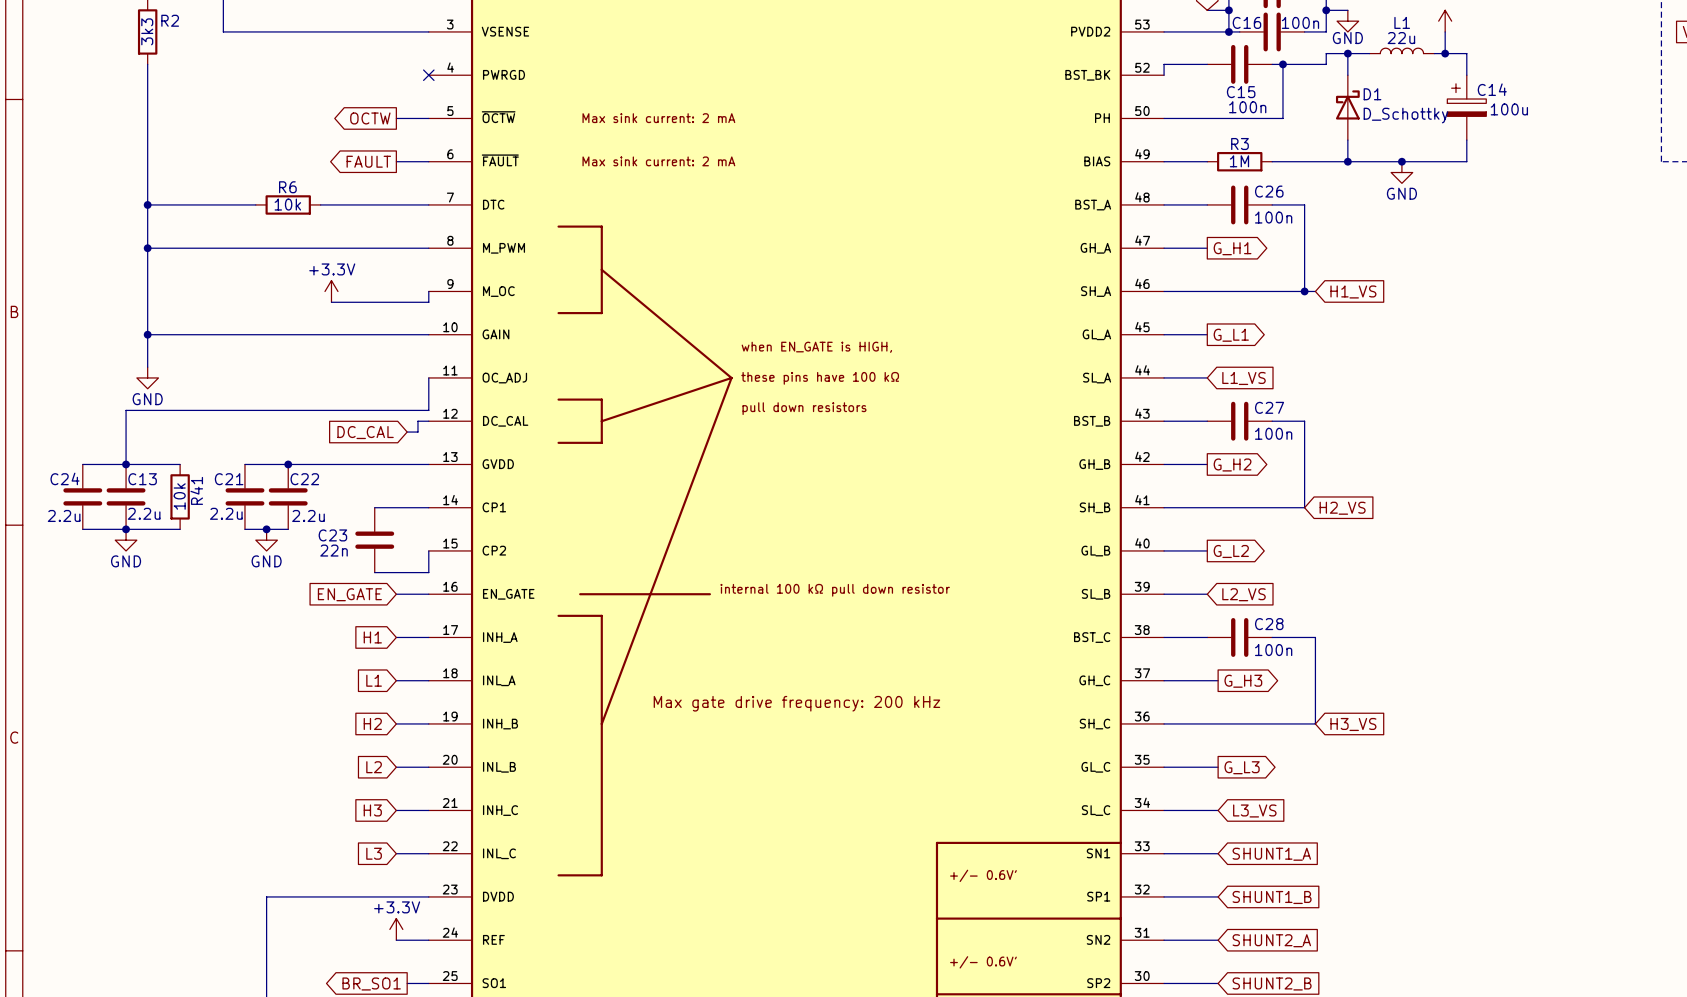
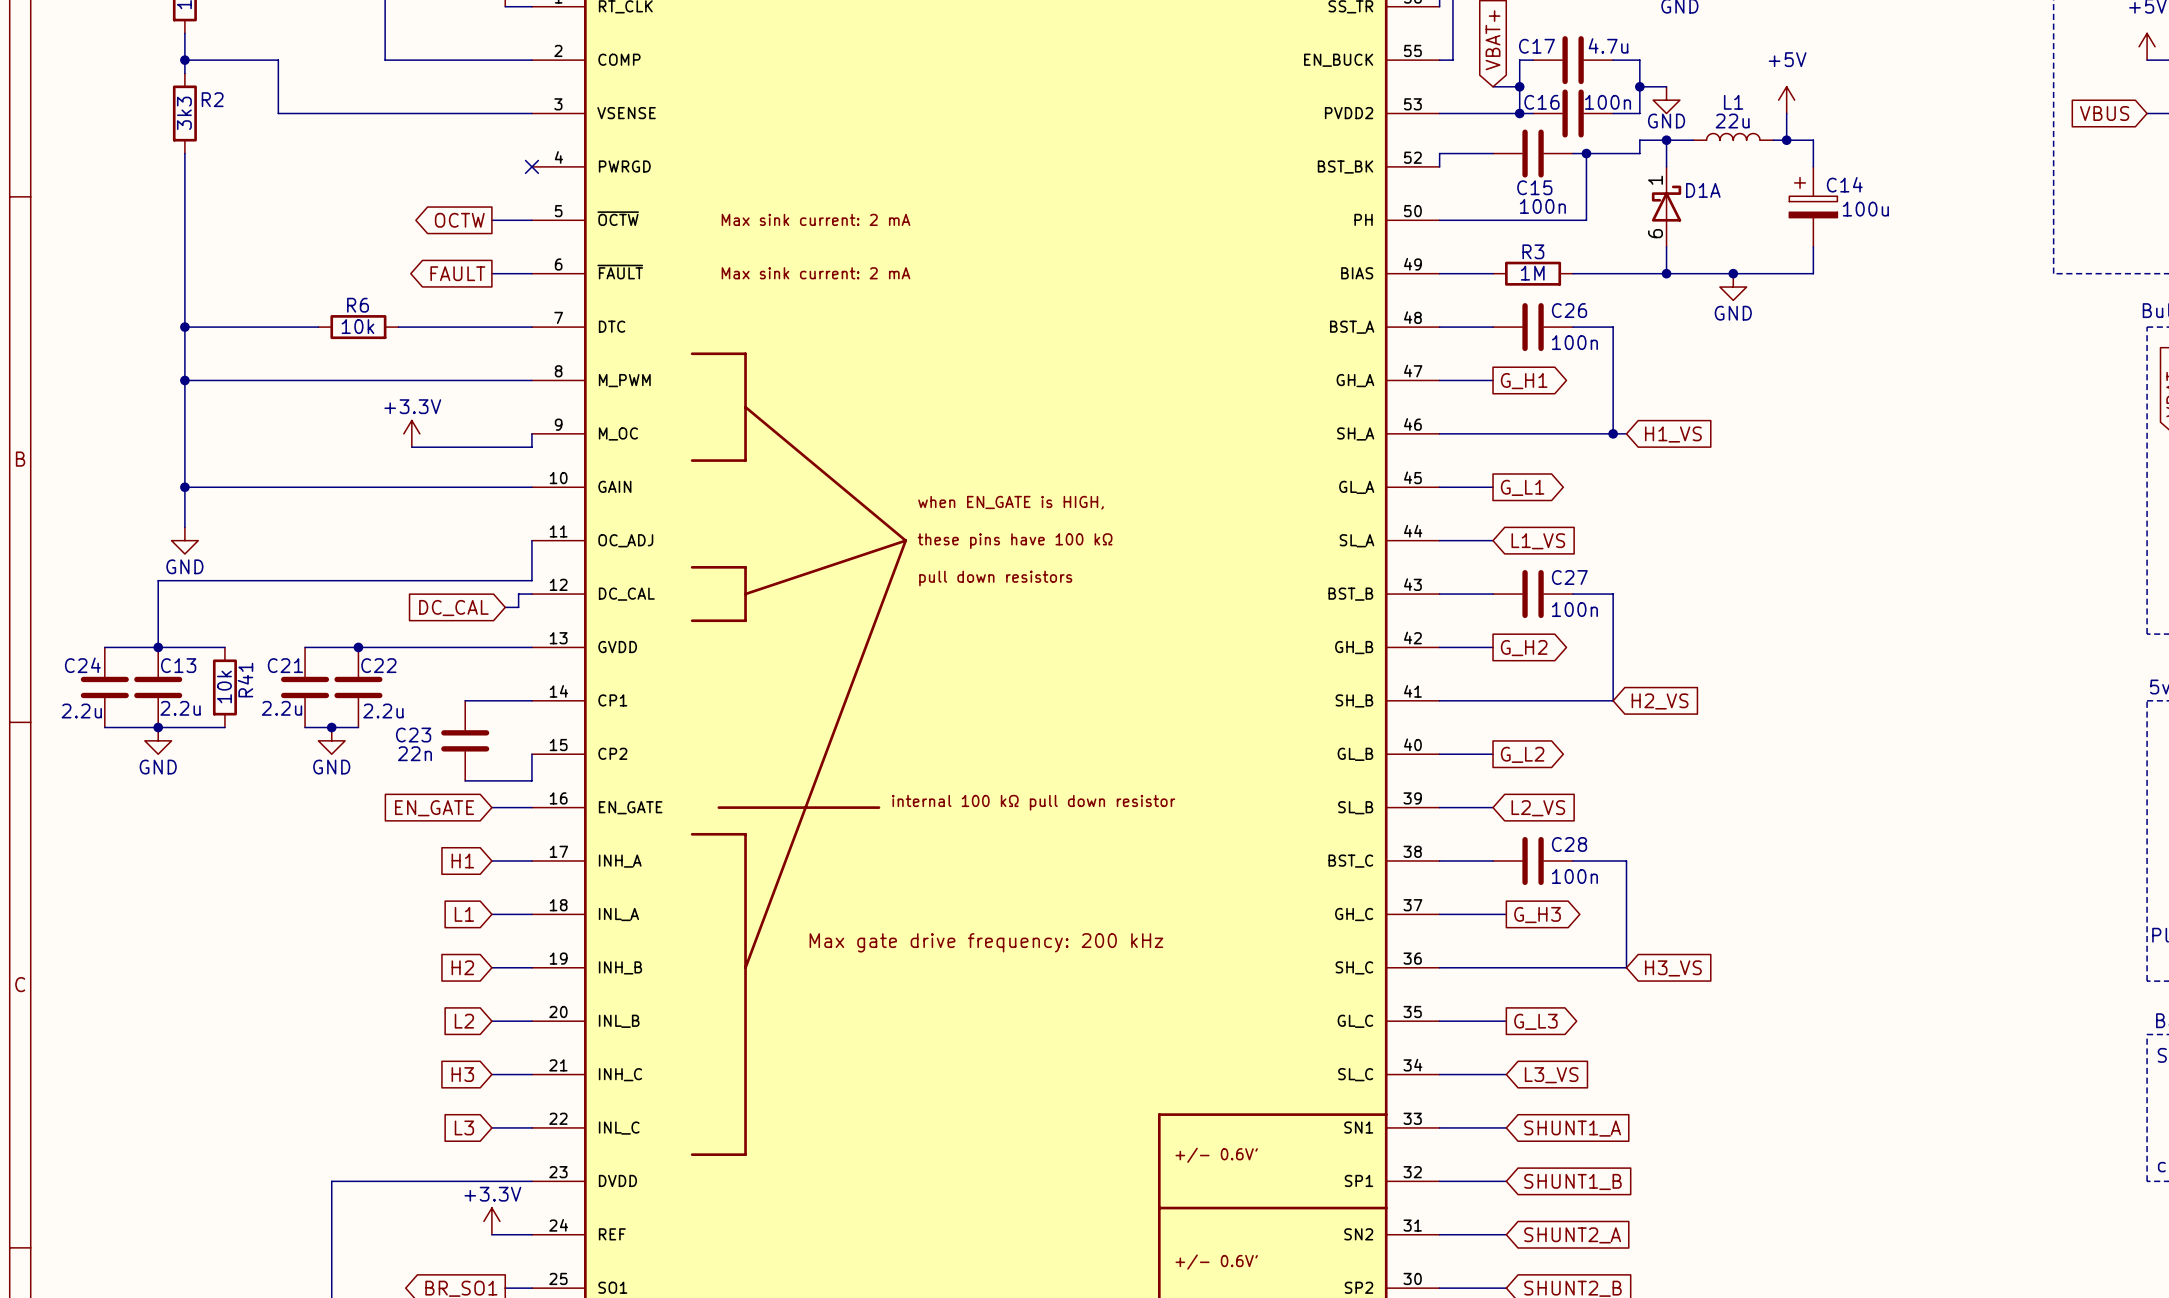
D1 pin number: none -> 1 (1655, 180)
D1 name: D1 (1372, 94) -> D1A (1703, 190)
D1 value: D_Schottky (1405, 115) -> none
D1 pin number: none -> 6 (1655, 233)

